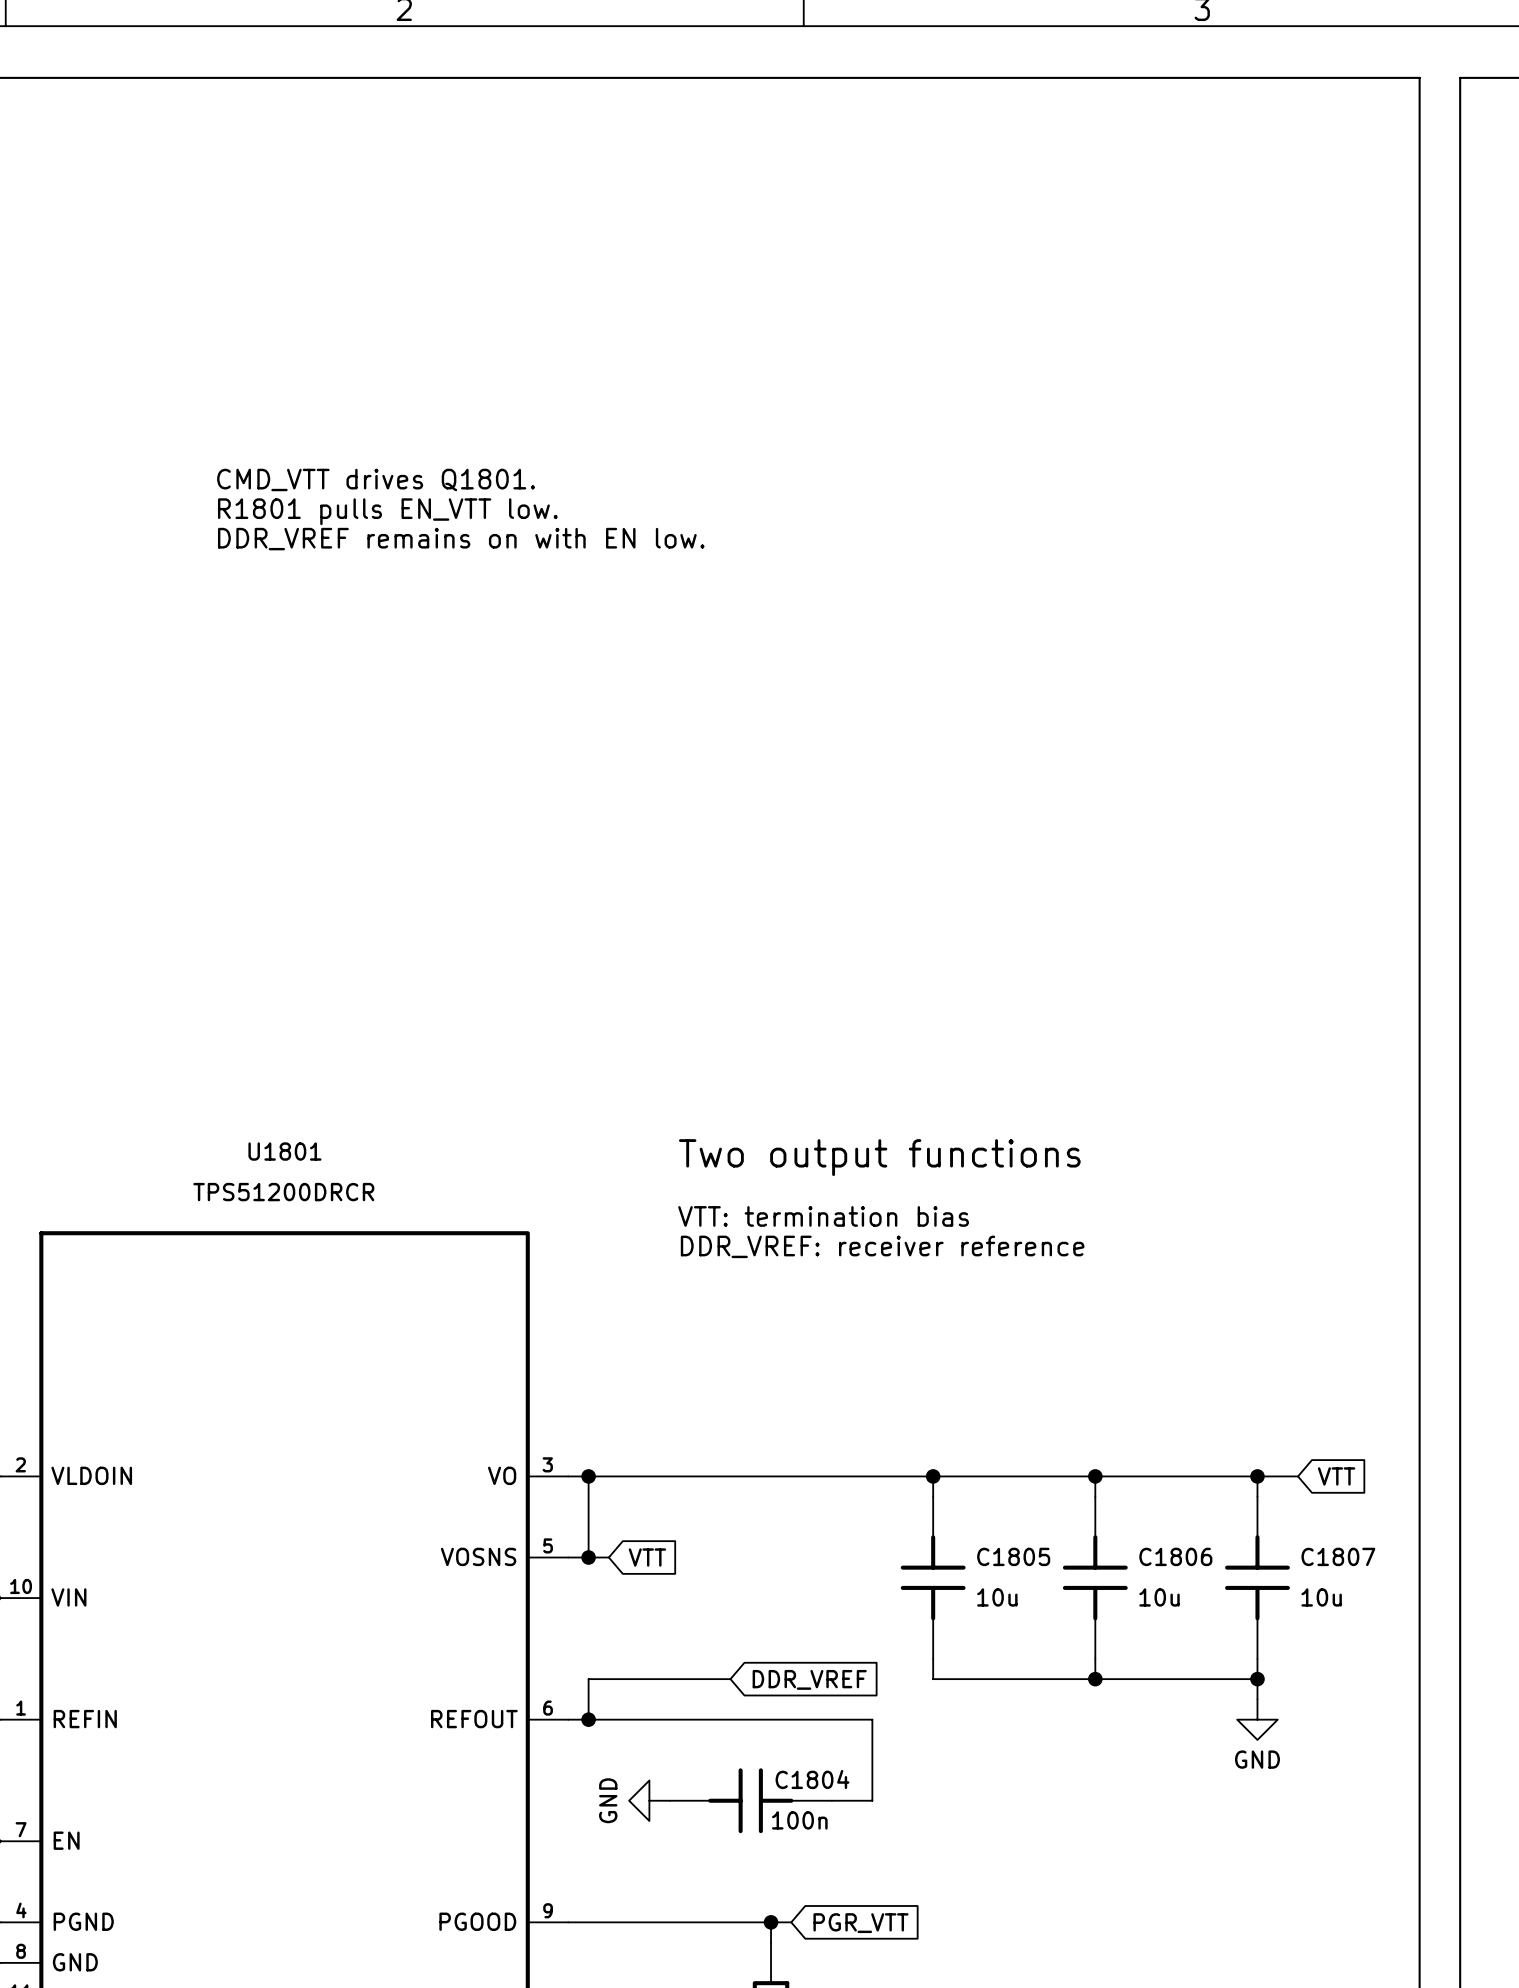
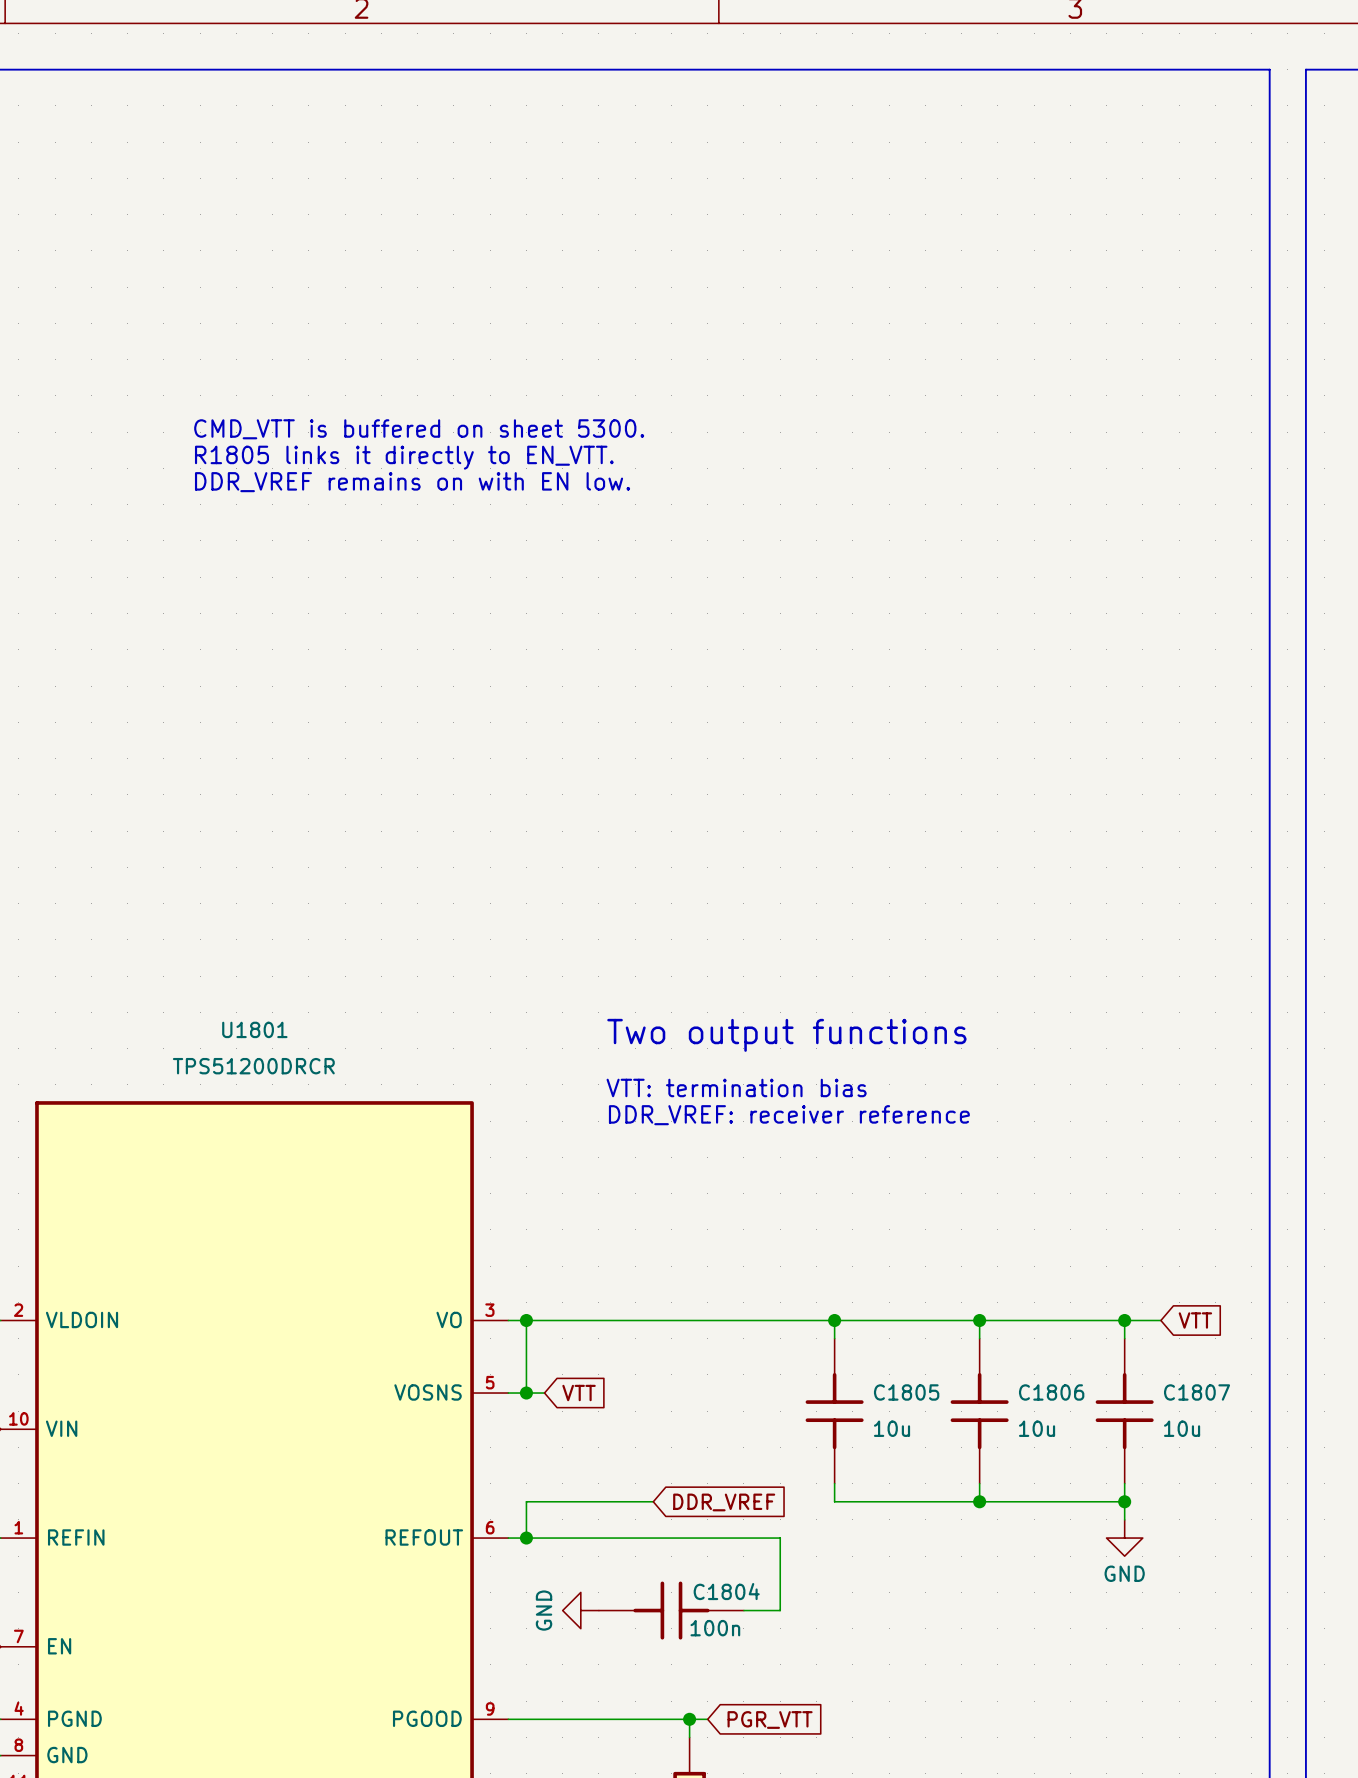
text: CMD_VTT drives Q1801. (376, 479) -> CMD_VTT is buffered on sheet 5300. (419, 429)
text: R1801 pulls EN_VTT low. (387, 511) -> R1805 links it directly to EN_VTT. (404, 457)

